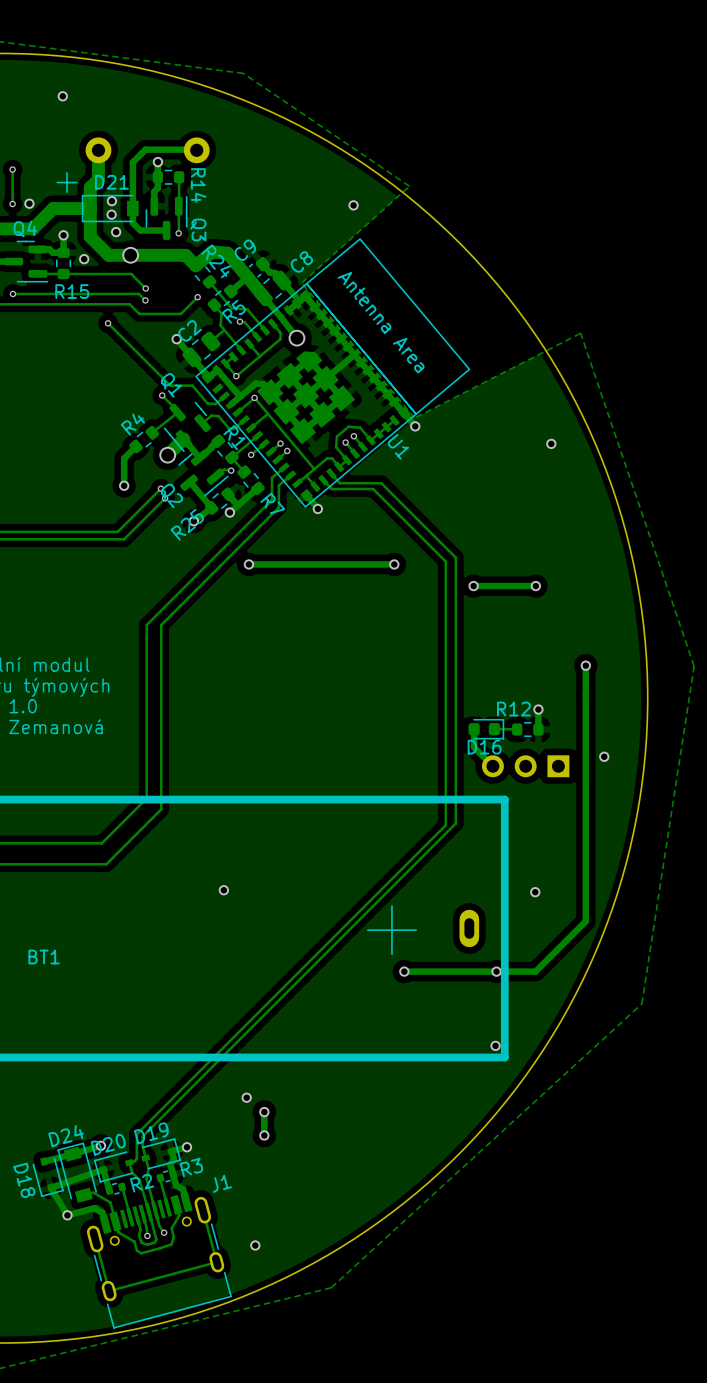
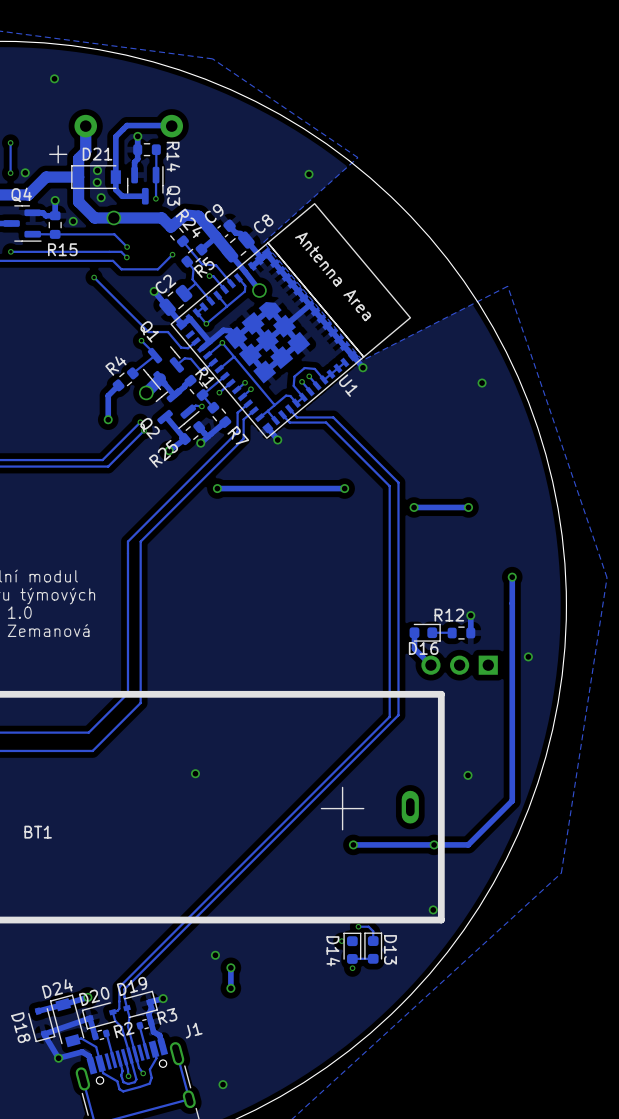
track: none -> (358, 926) (368, 926) (373, 931) (373, 941)
via: none -> (358, 926)
via: none -> (341, 941)
D14: none -> (352, 948)
D13: none -> (373, 948)
track: none -> (373, 958) (352, 958)
via: none -> (352, 968)

